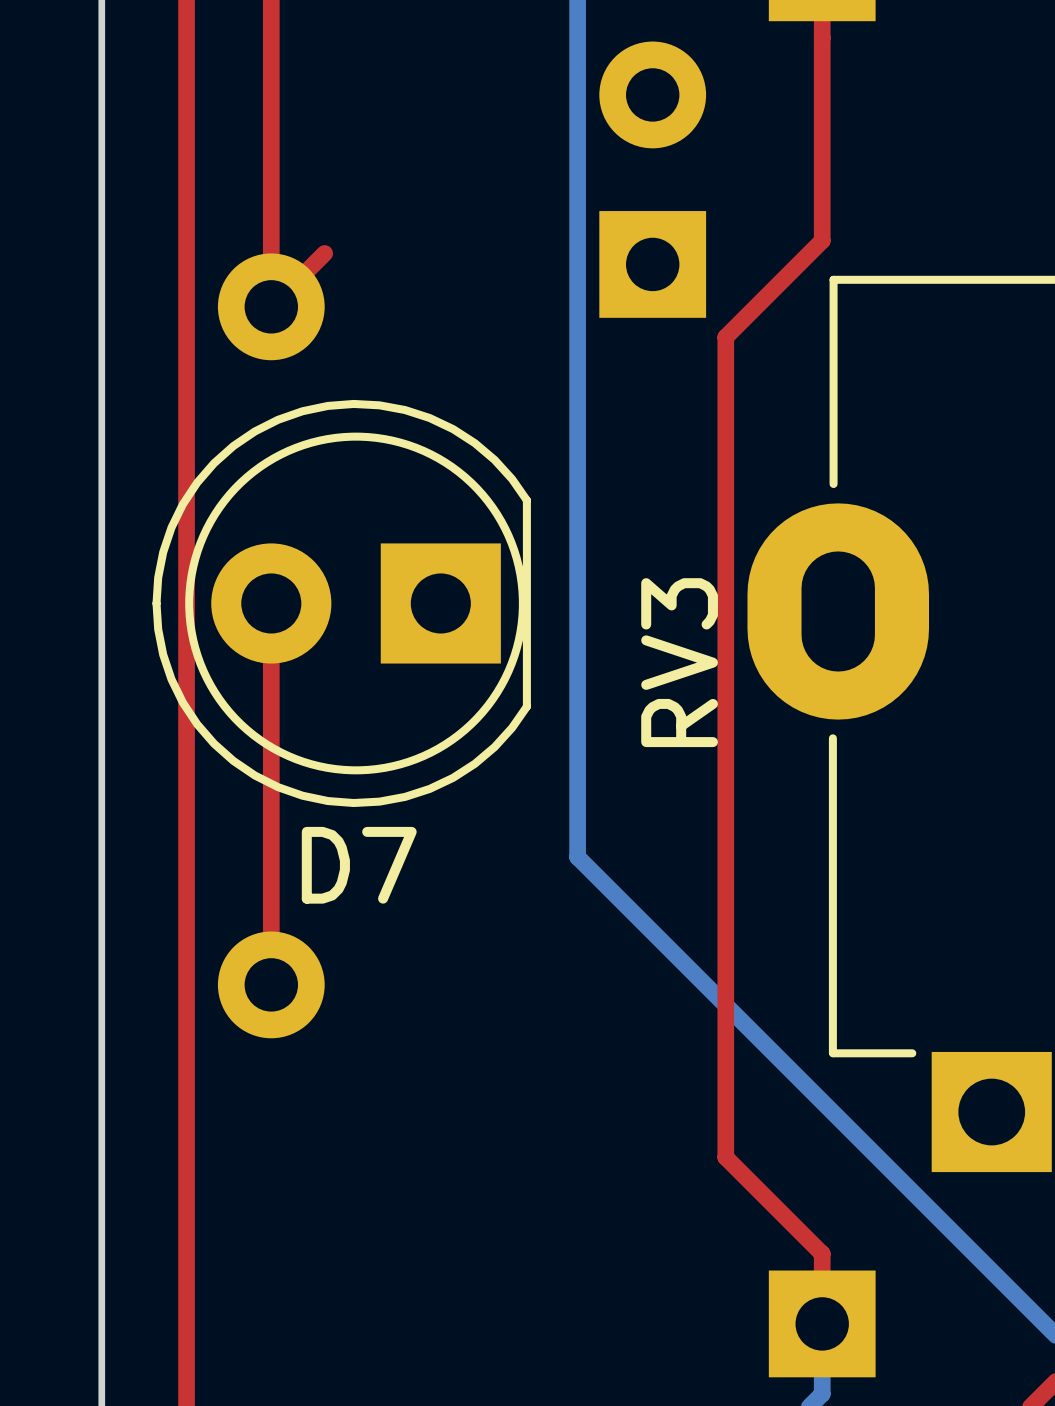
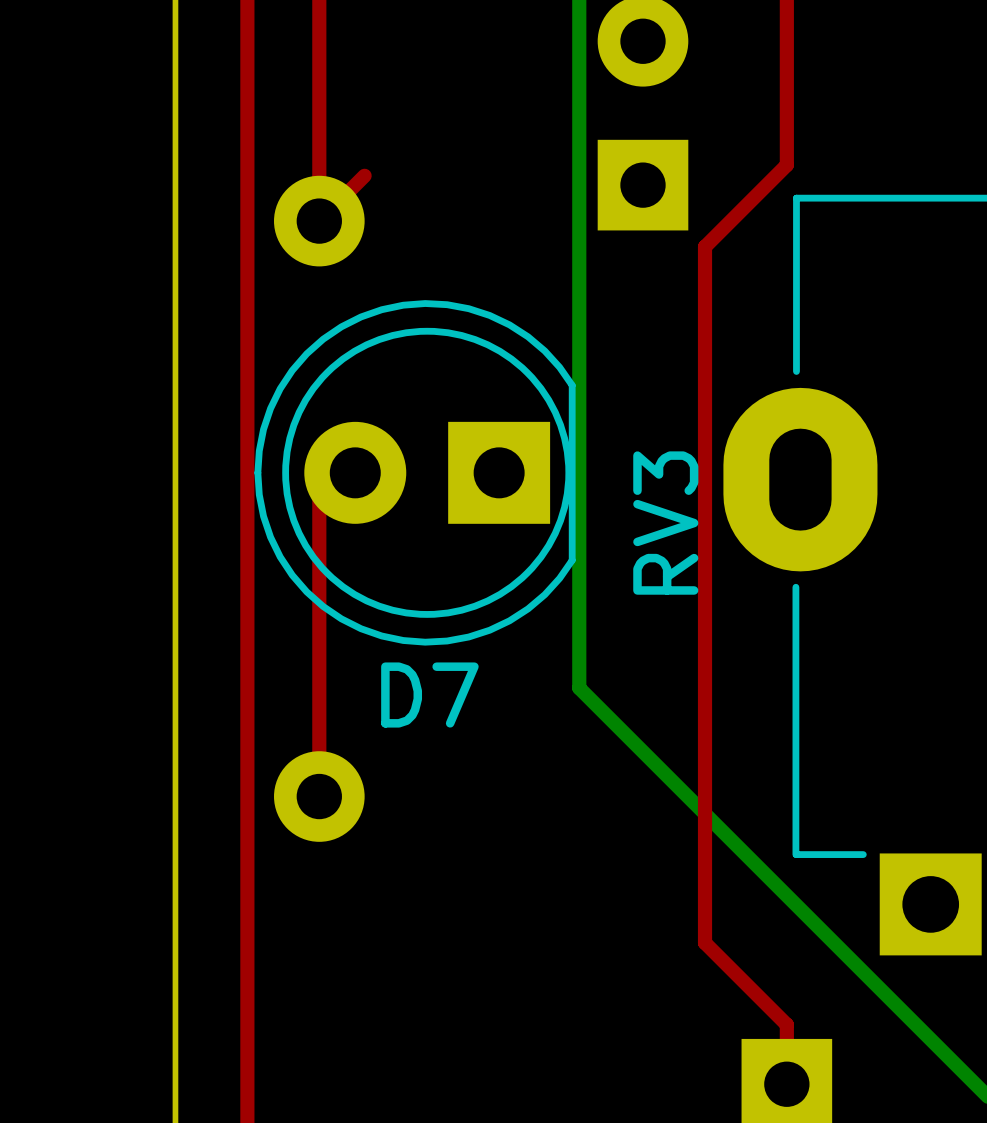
D7 position: (341, 603) -> (415, 472)

